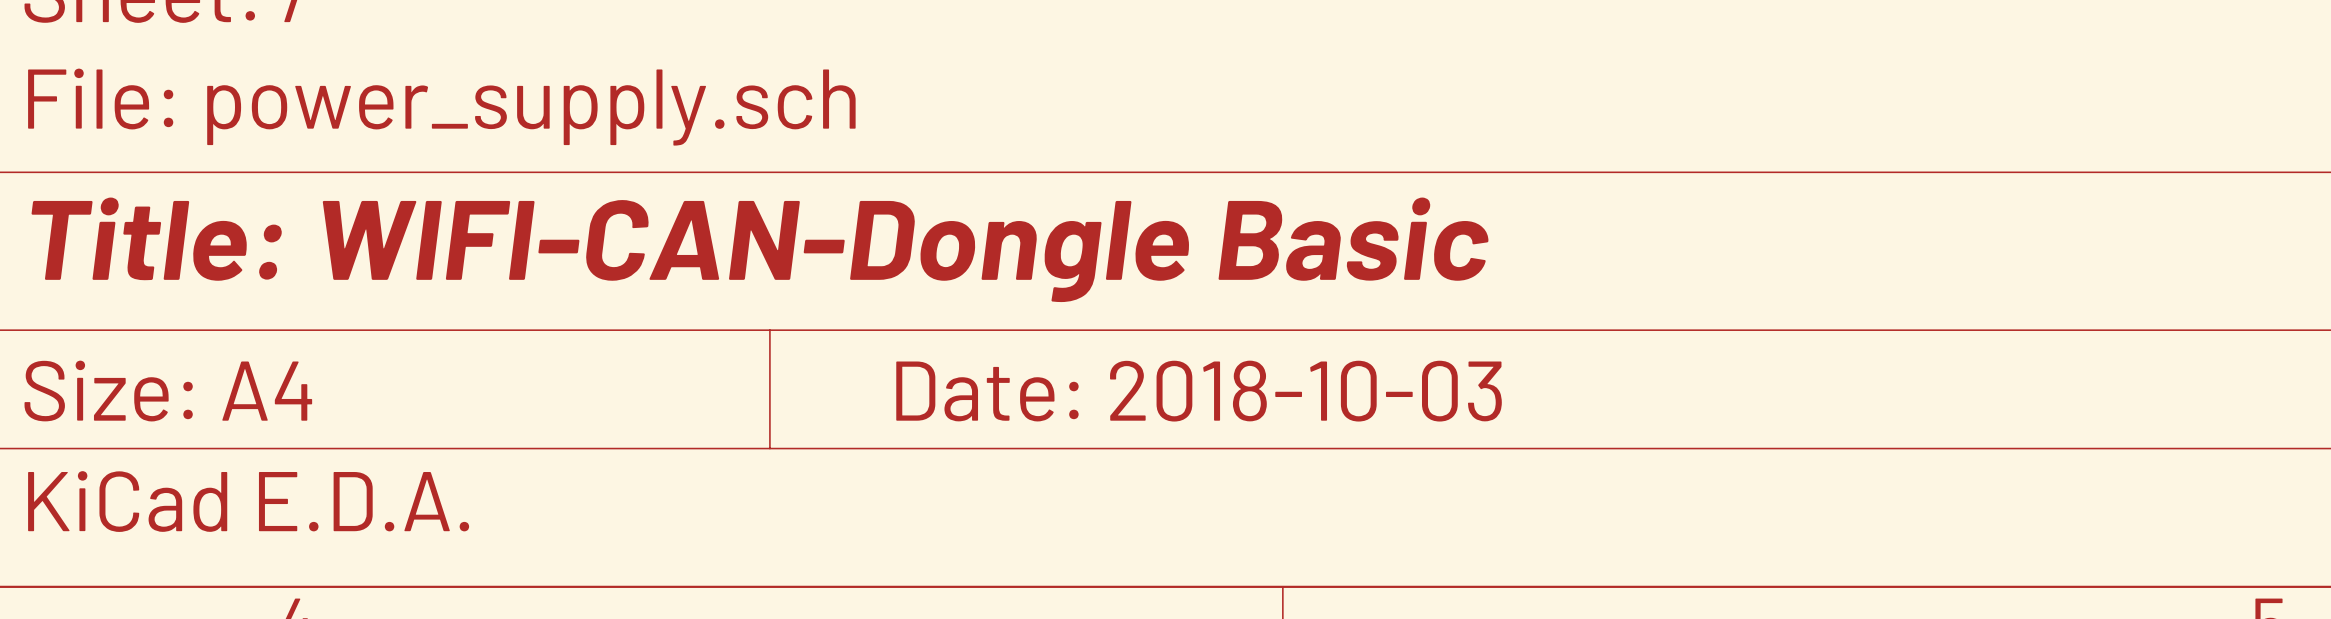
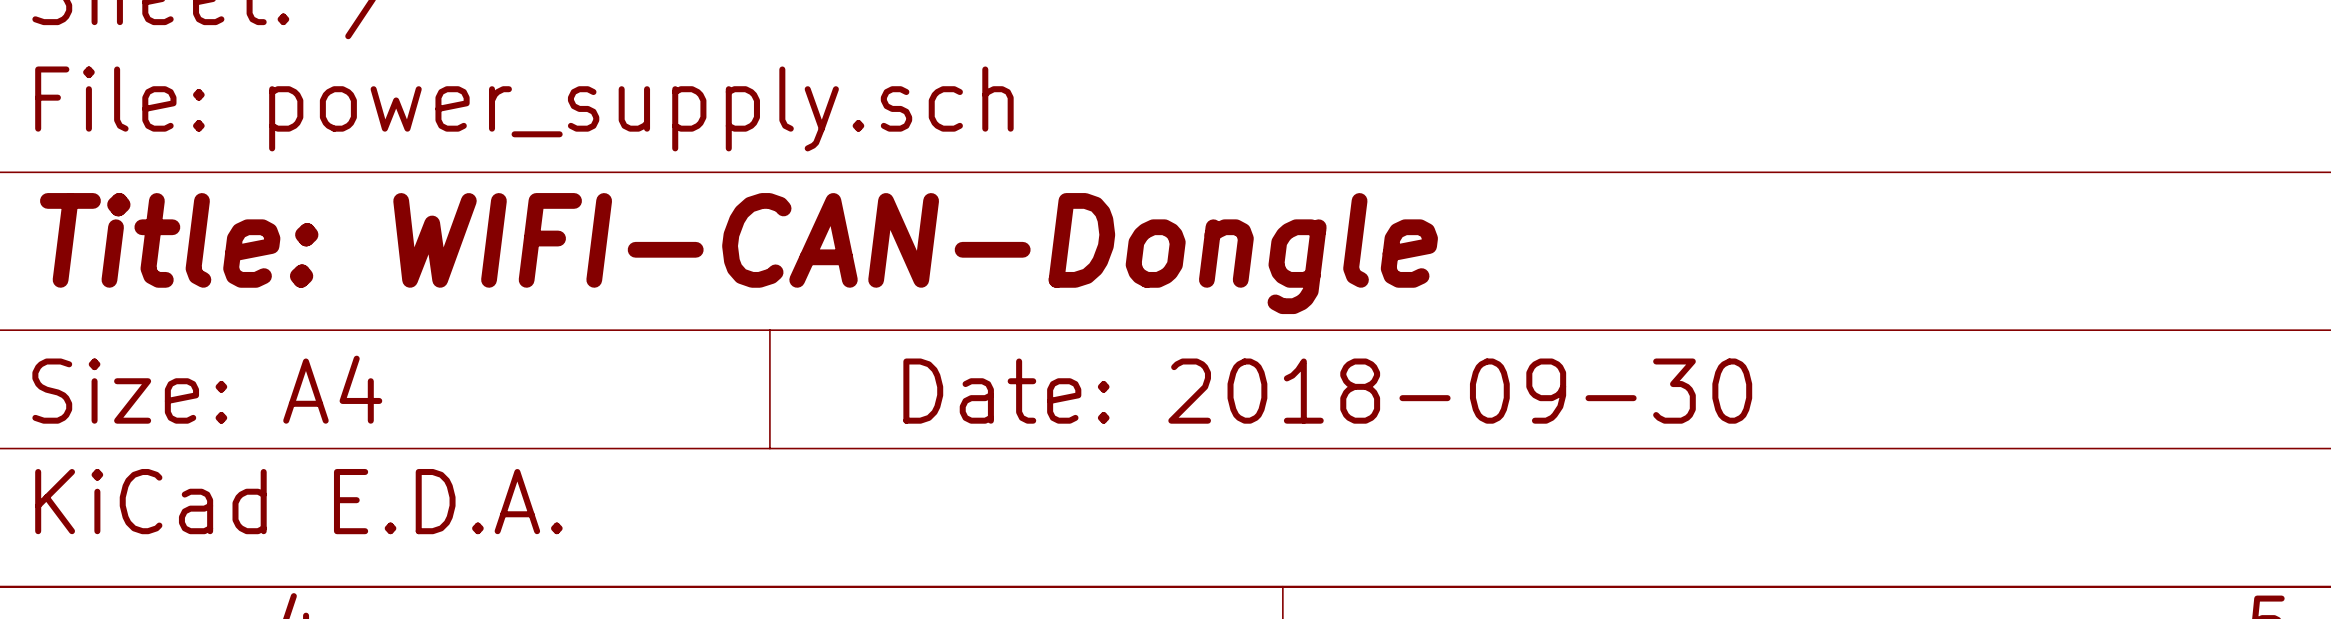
title block: Title: WIFI-CAN-Dongle Basic (760, 249) -> Title: WIFI-CAN-Dongle (738, 253)
title block: Date: 2018-10-03 (1199, 391) -> Date: 2018-09-30 (1327, 391)

